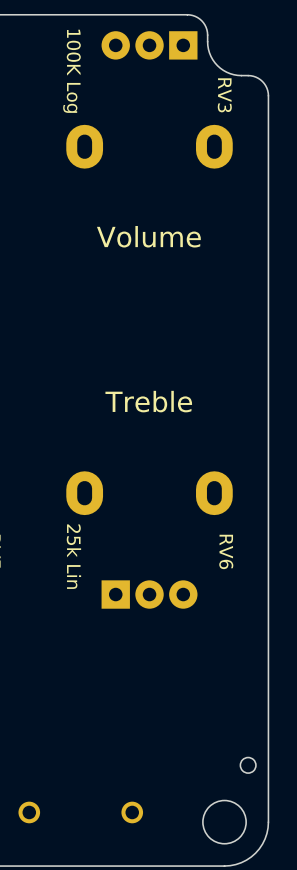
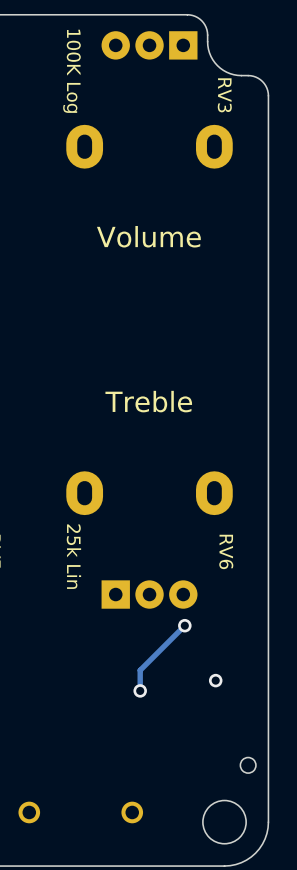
track: none -> (184, 625) (140, 670) (140, 690)
via: none -> (184, 625)
via: none -> (215, 680)
via: none -> (140, 690)

